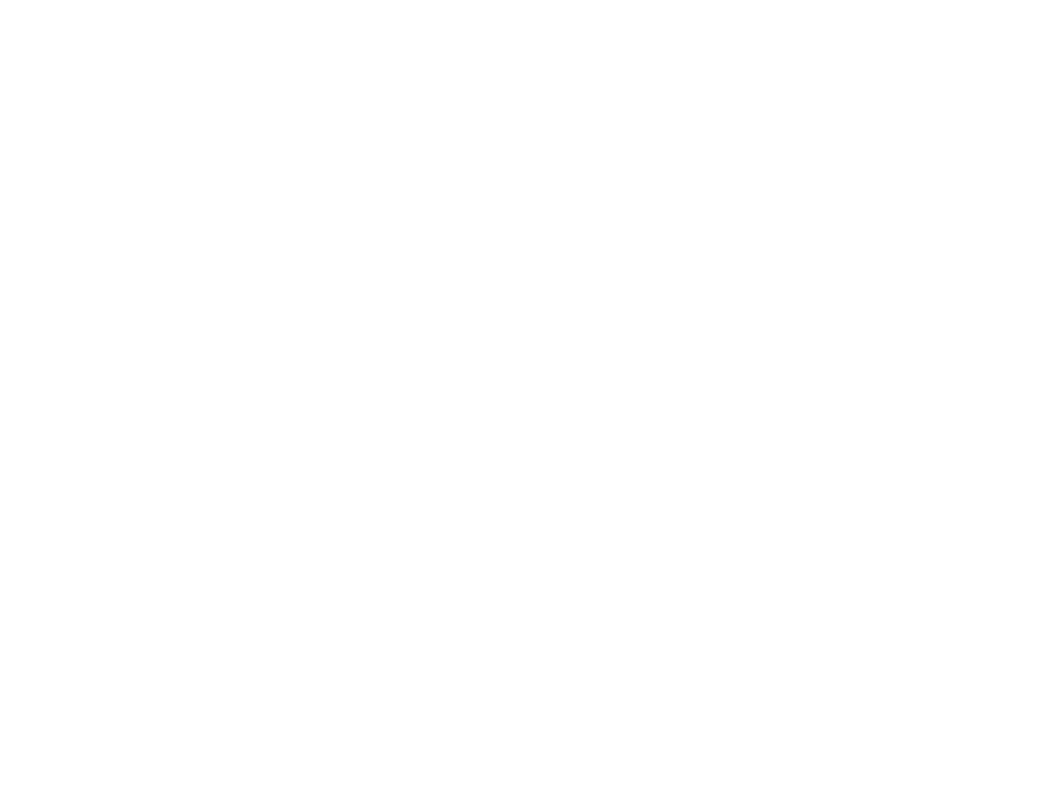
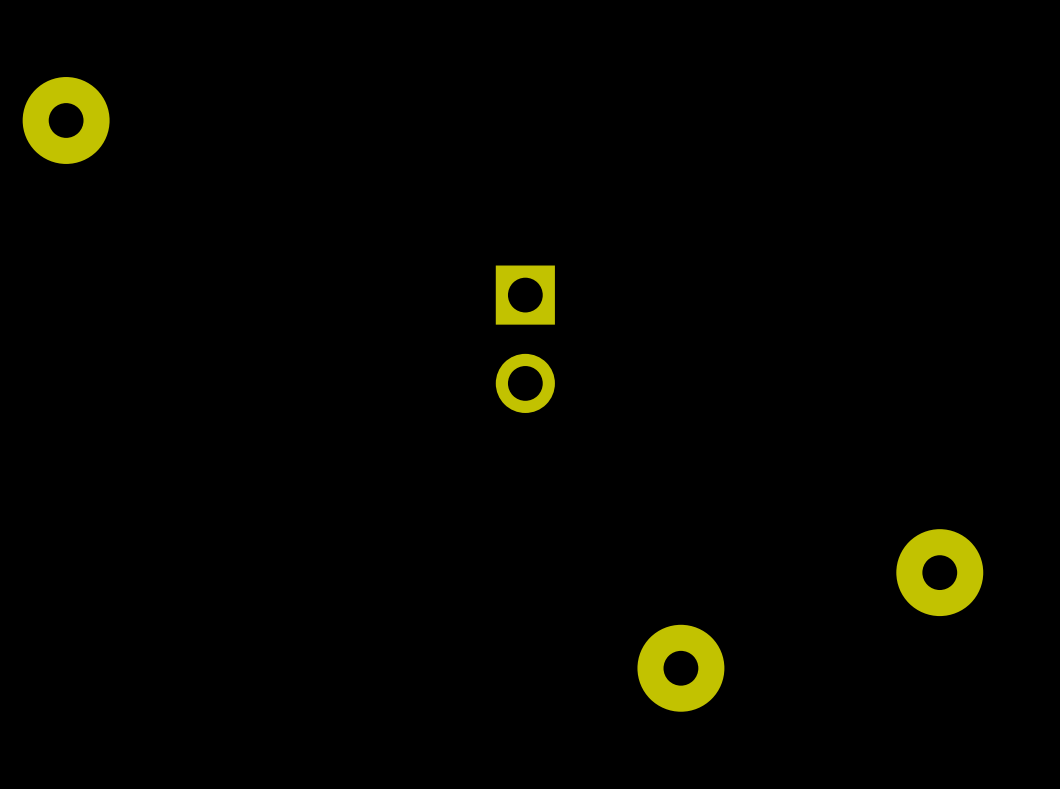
part: none -> (66, 120)
part: none -> (525, 339)
part: none -> (939, 572)
part: none -> (680, 668)

